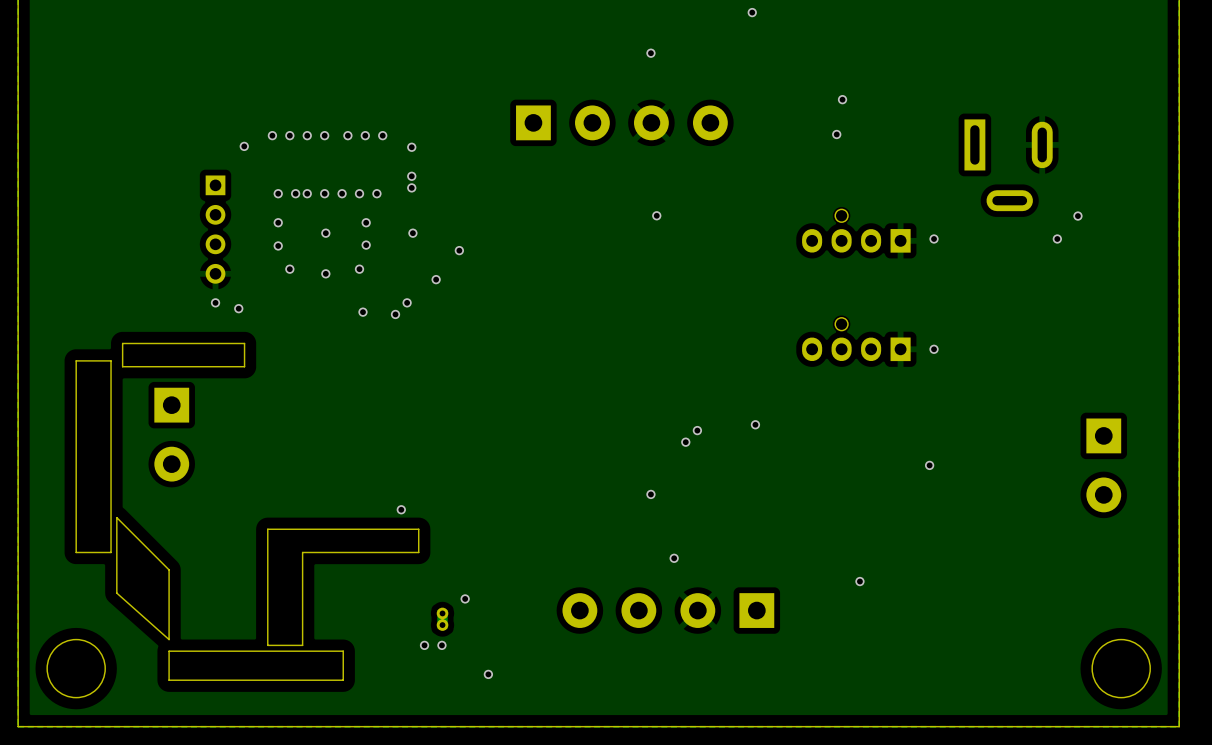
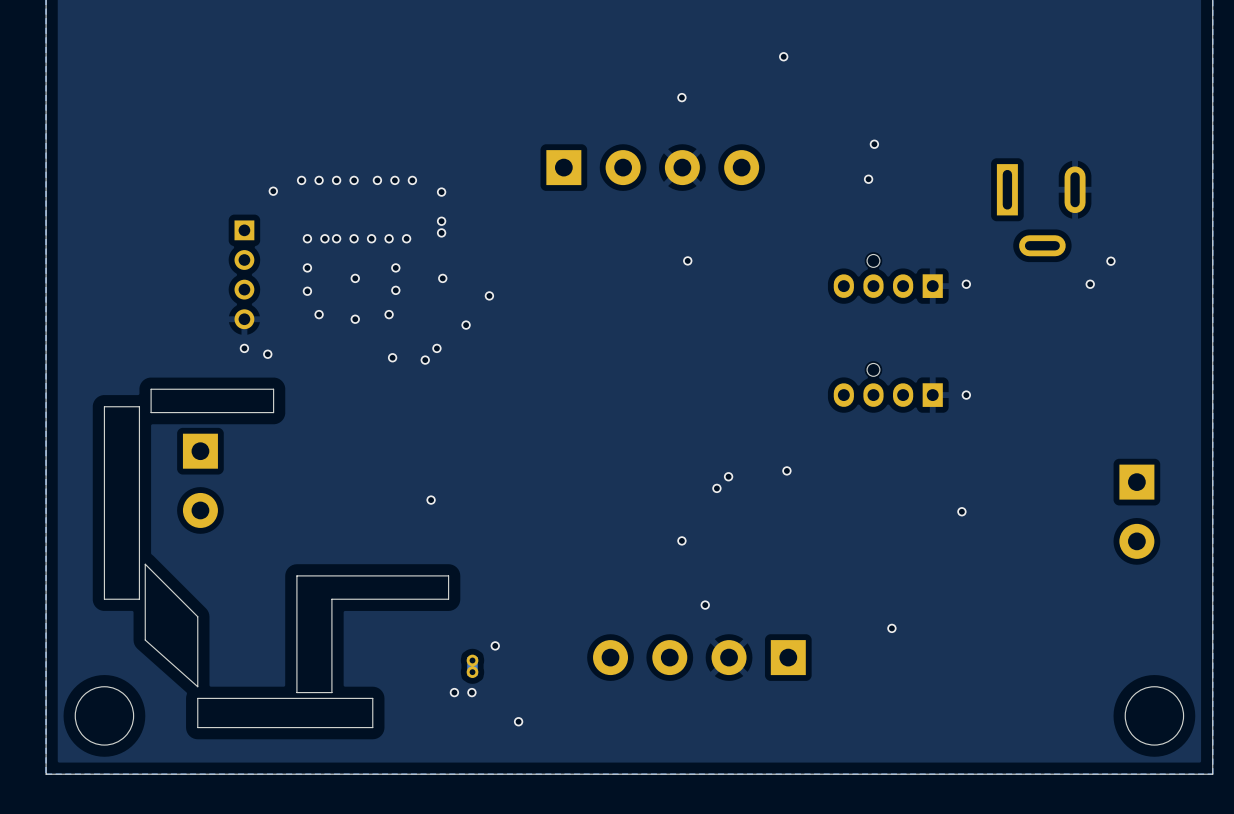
via position: (401, 509) -> (431, 500)

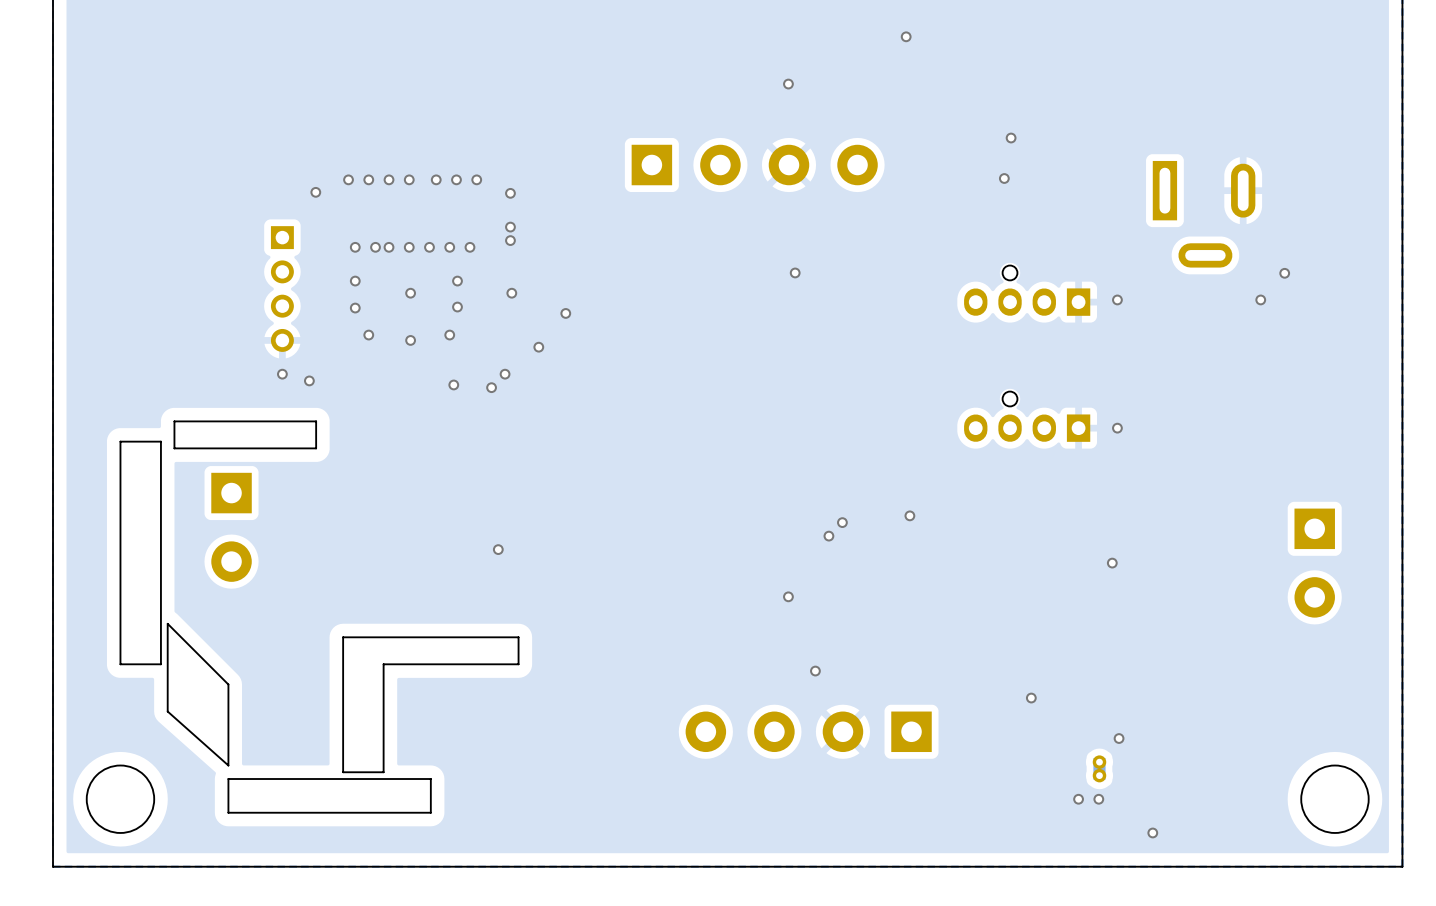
via: (495, 645) -> none
via: none -> (1119, 738)
part: (472, 666) -> none
part: none -> (1099, 768)
via: (454, 692) -> none
via: (471, 692) -> none
via: none -> (1078, 799)
via: none -> (1098, 799)
via: (518, 721) -> none
via: none -> (1152, 832)

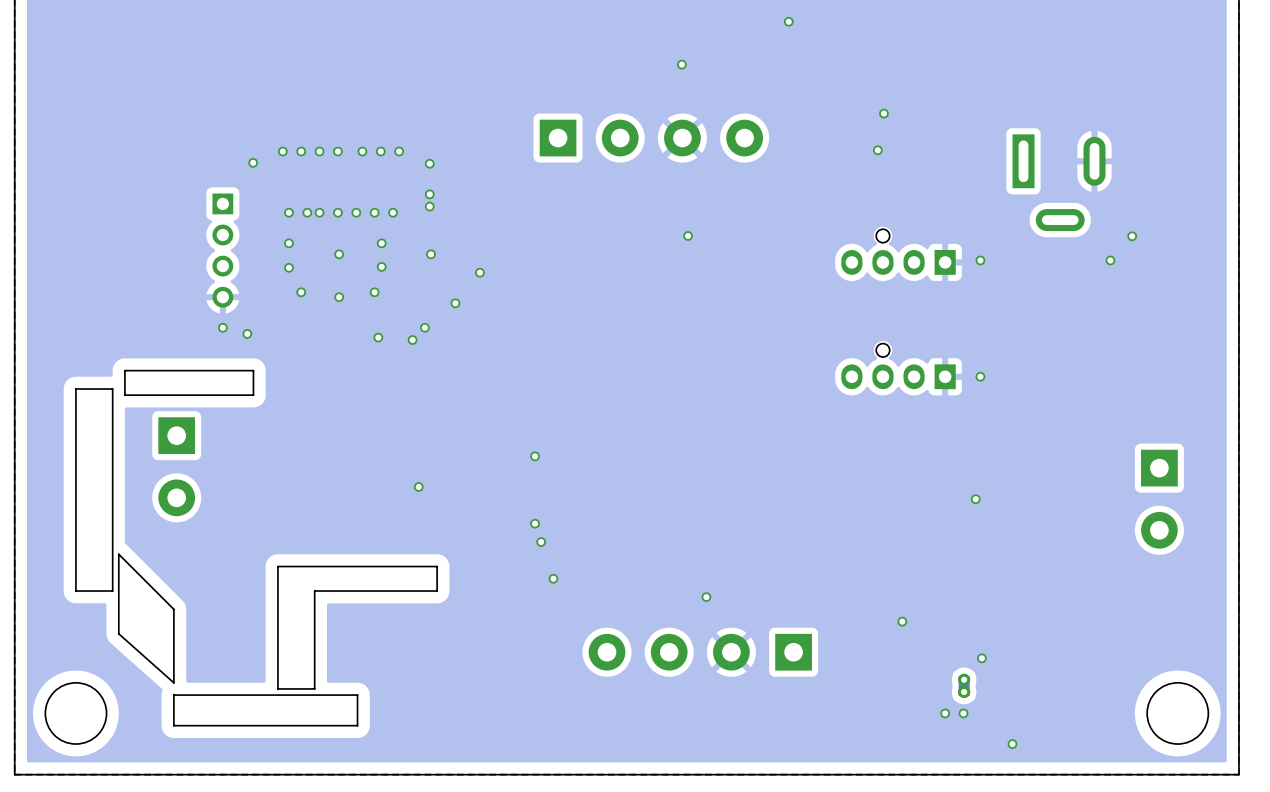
via: none -> (535, 456)
via: (909, 515) -> none
via: (842, 522) -> none
via: (828, 536) -> none
via: none -> (535, 523)
via: (788, 596) -> none
via: none -> (541, 542)
via: none -> (553, 578)

